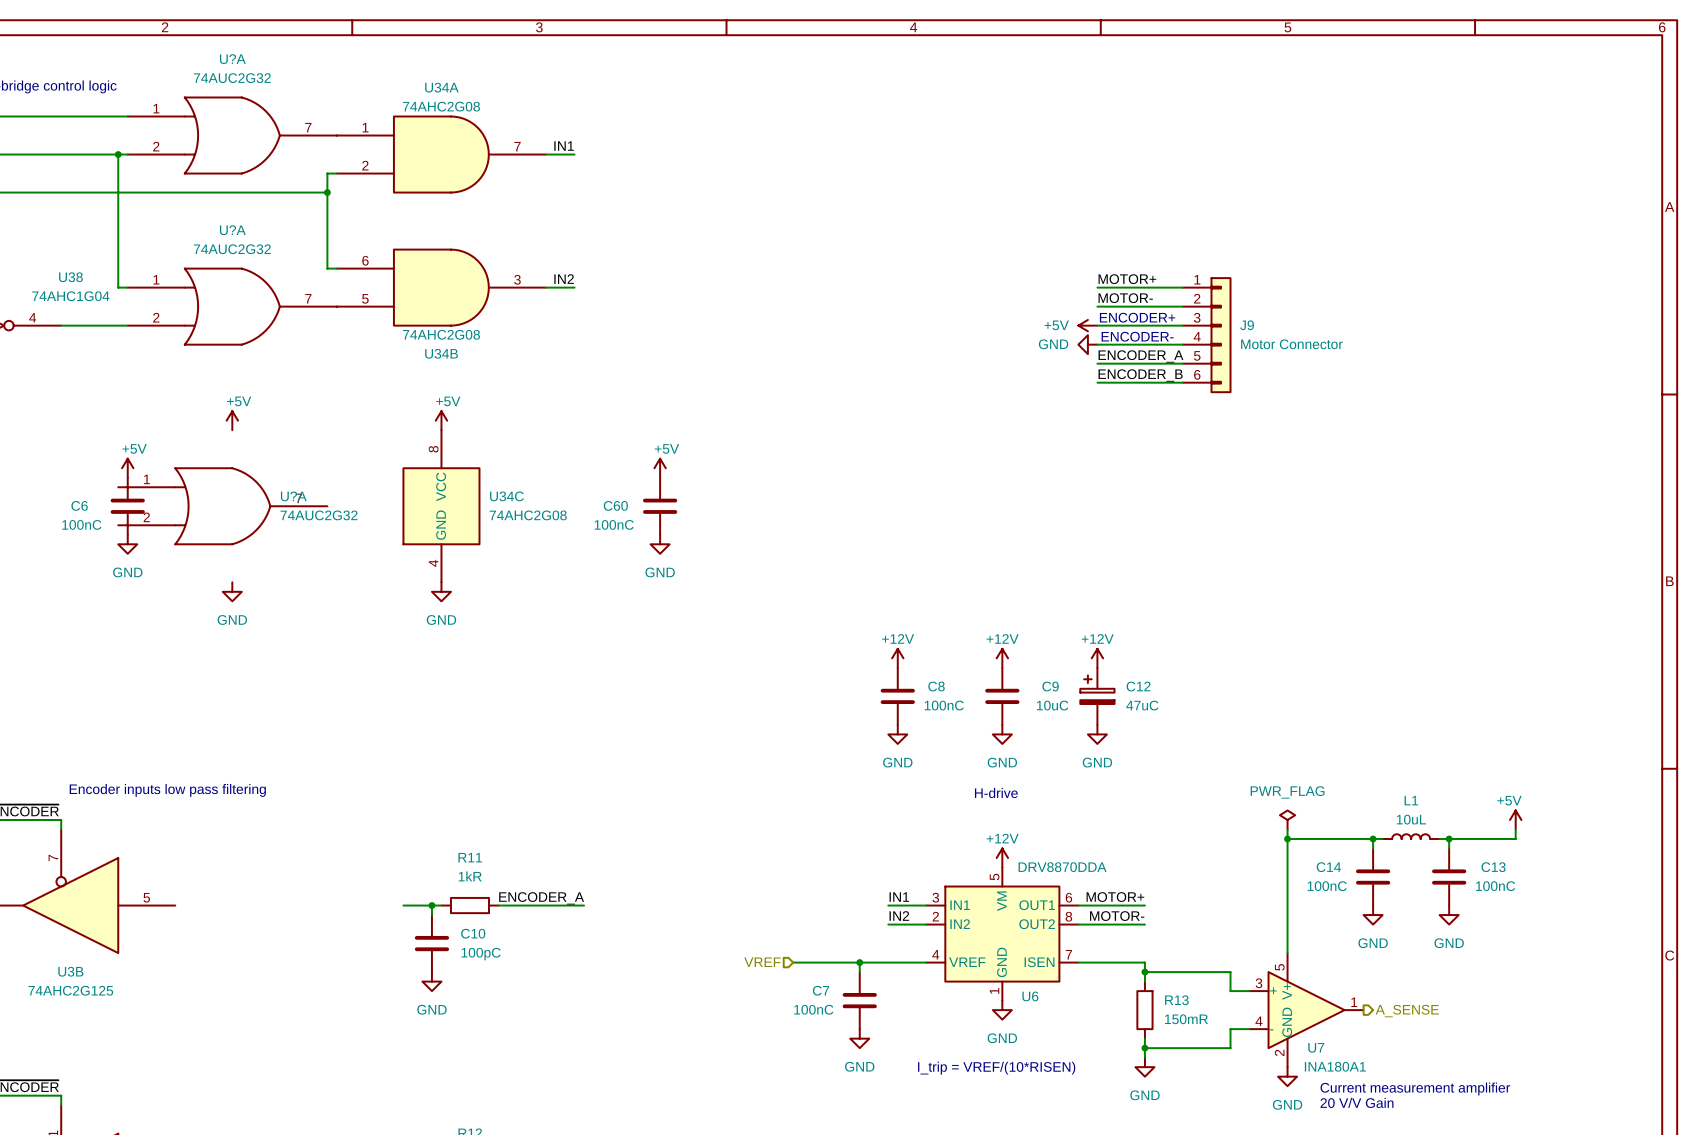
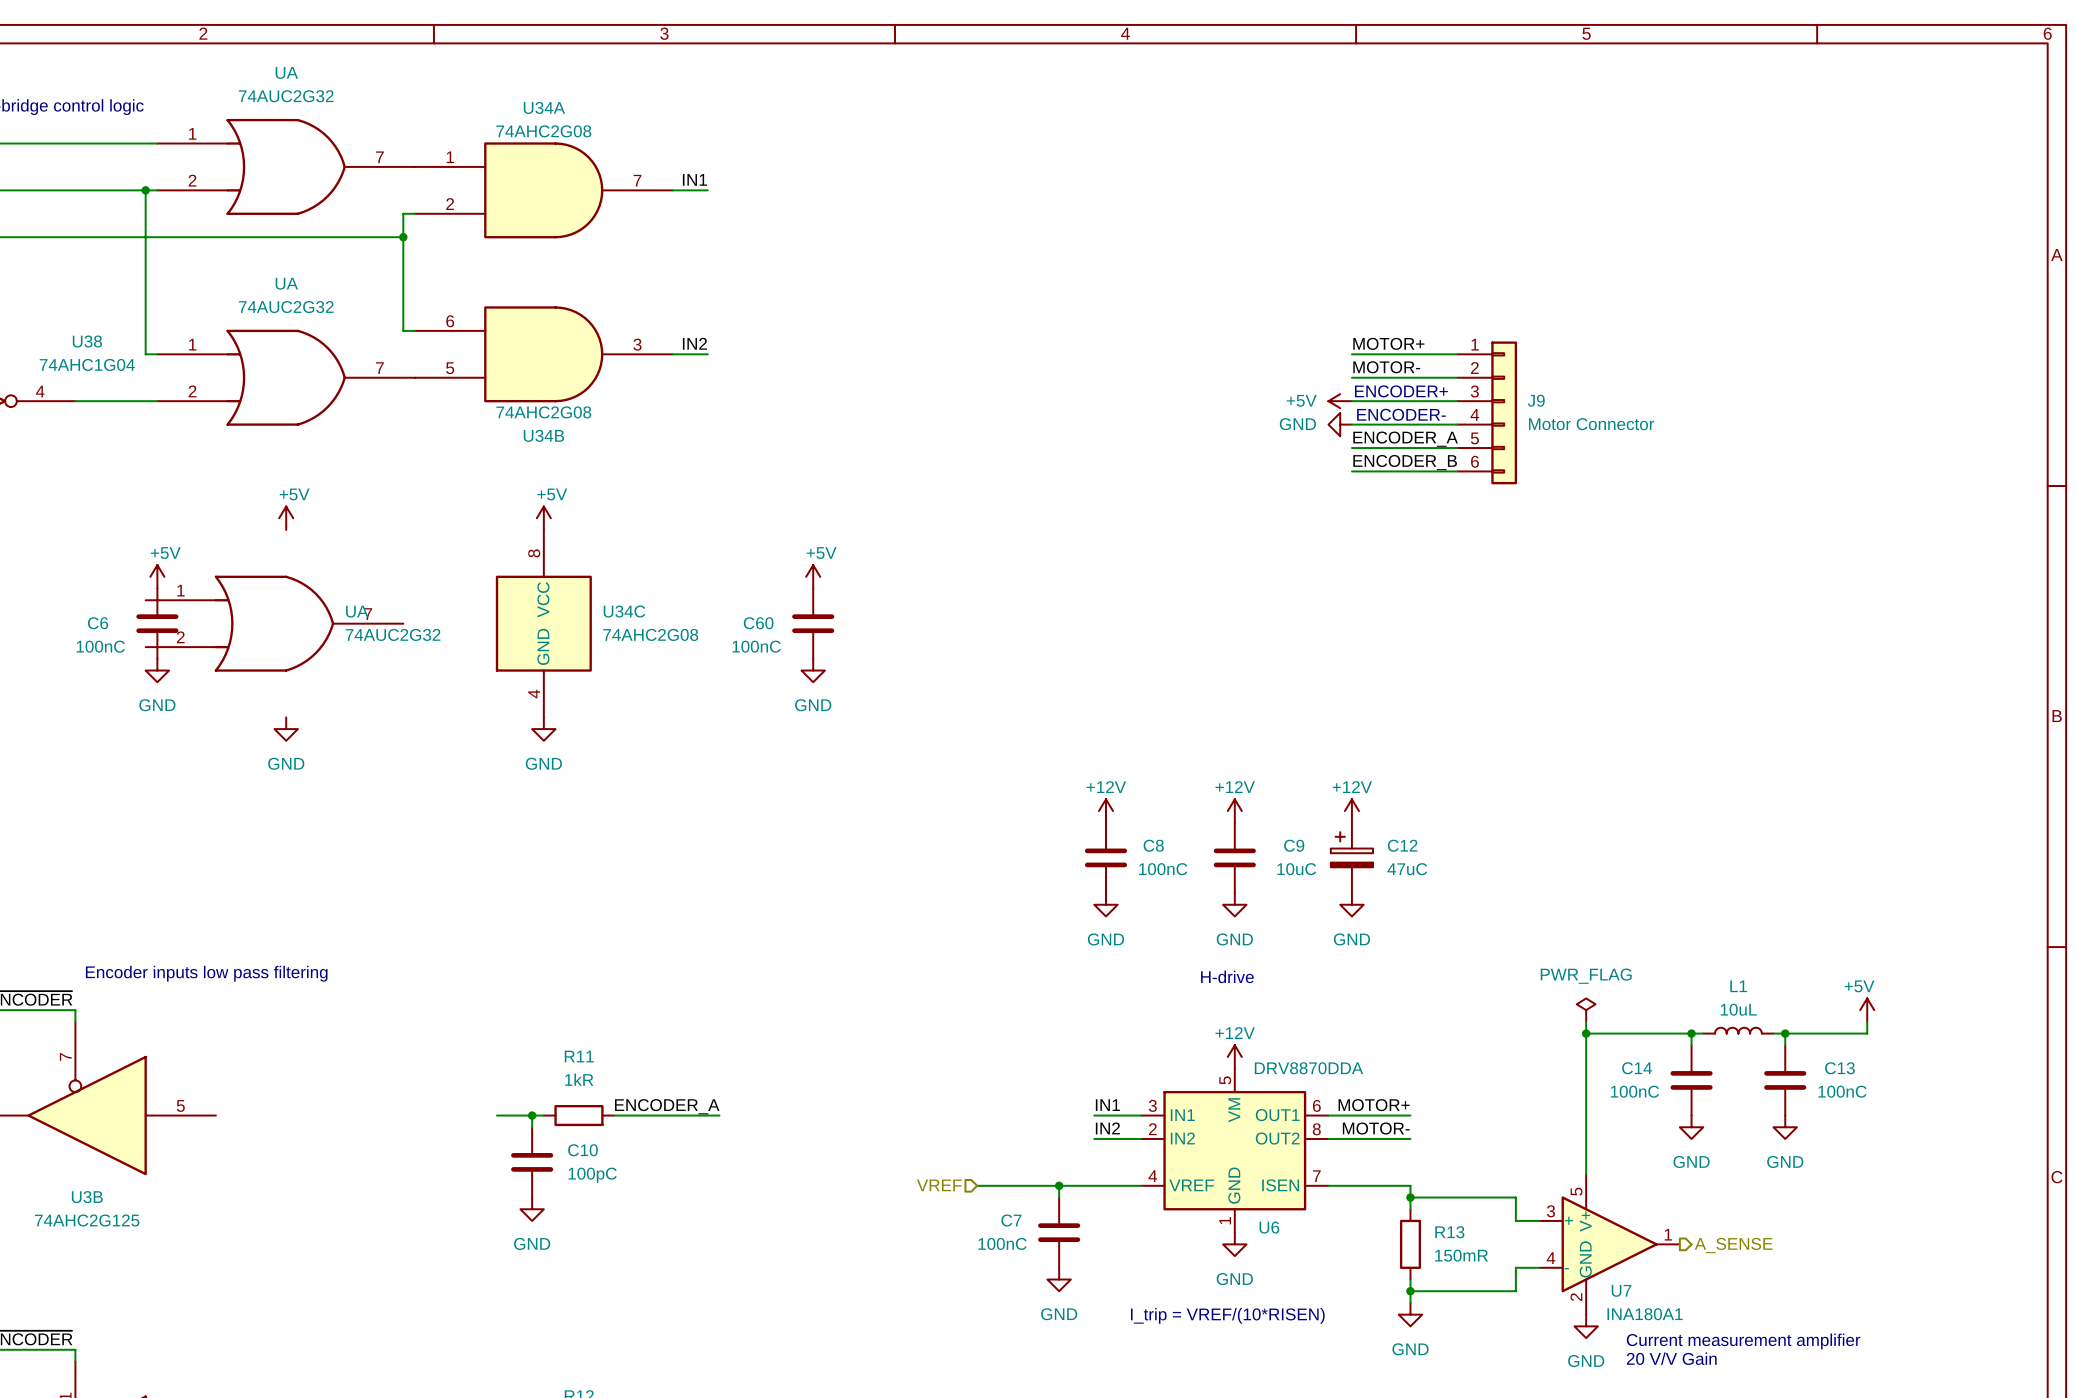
U?A name: U?A (232, 59) -> UA (286, 72)
U?A name: U?A (232, 230) -> UA (286, 283)
U?A name: U?A (293, 496) -> UA (357, 611)

